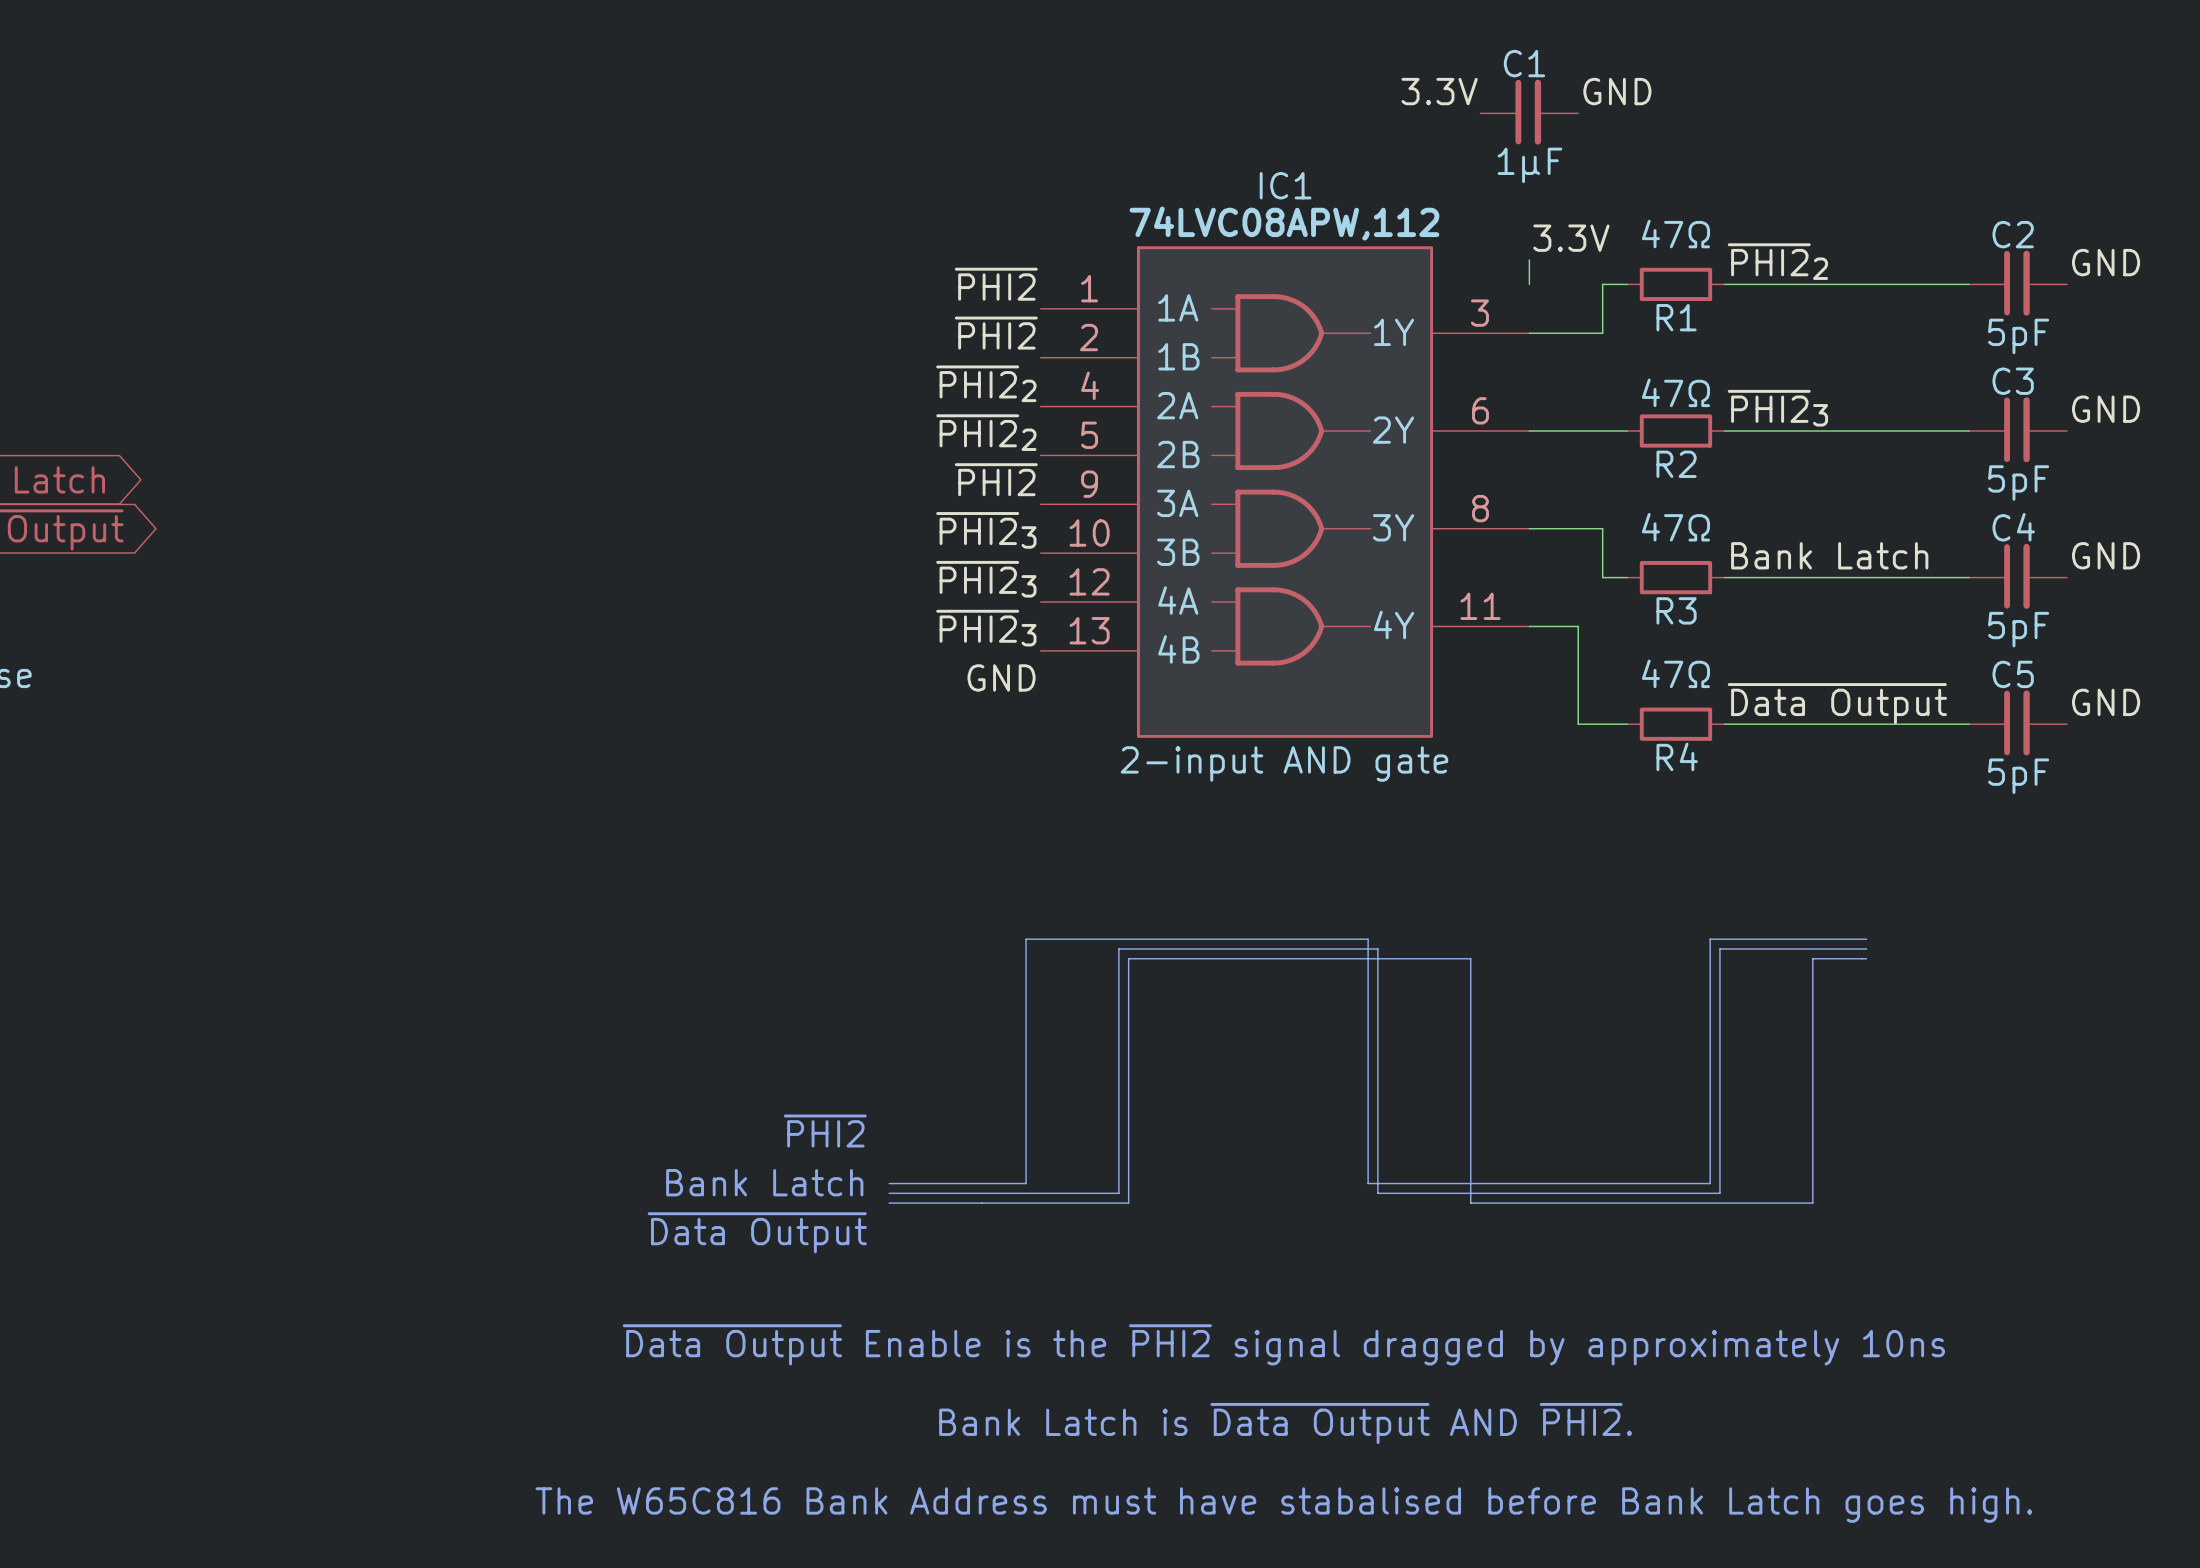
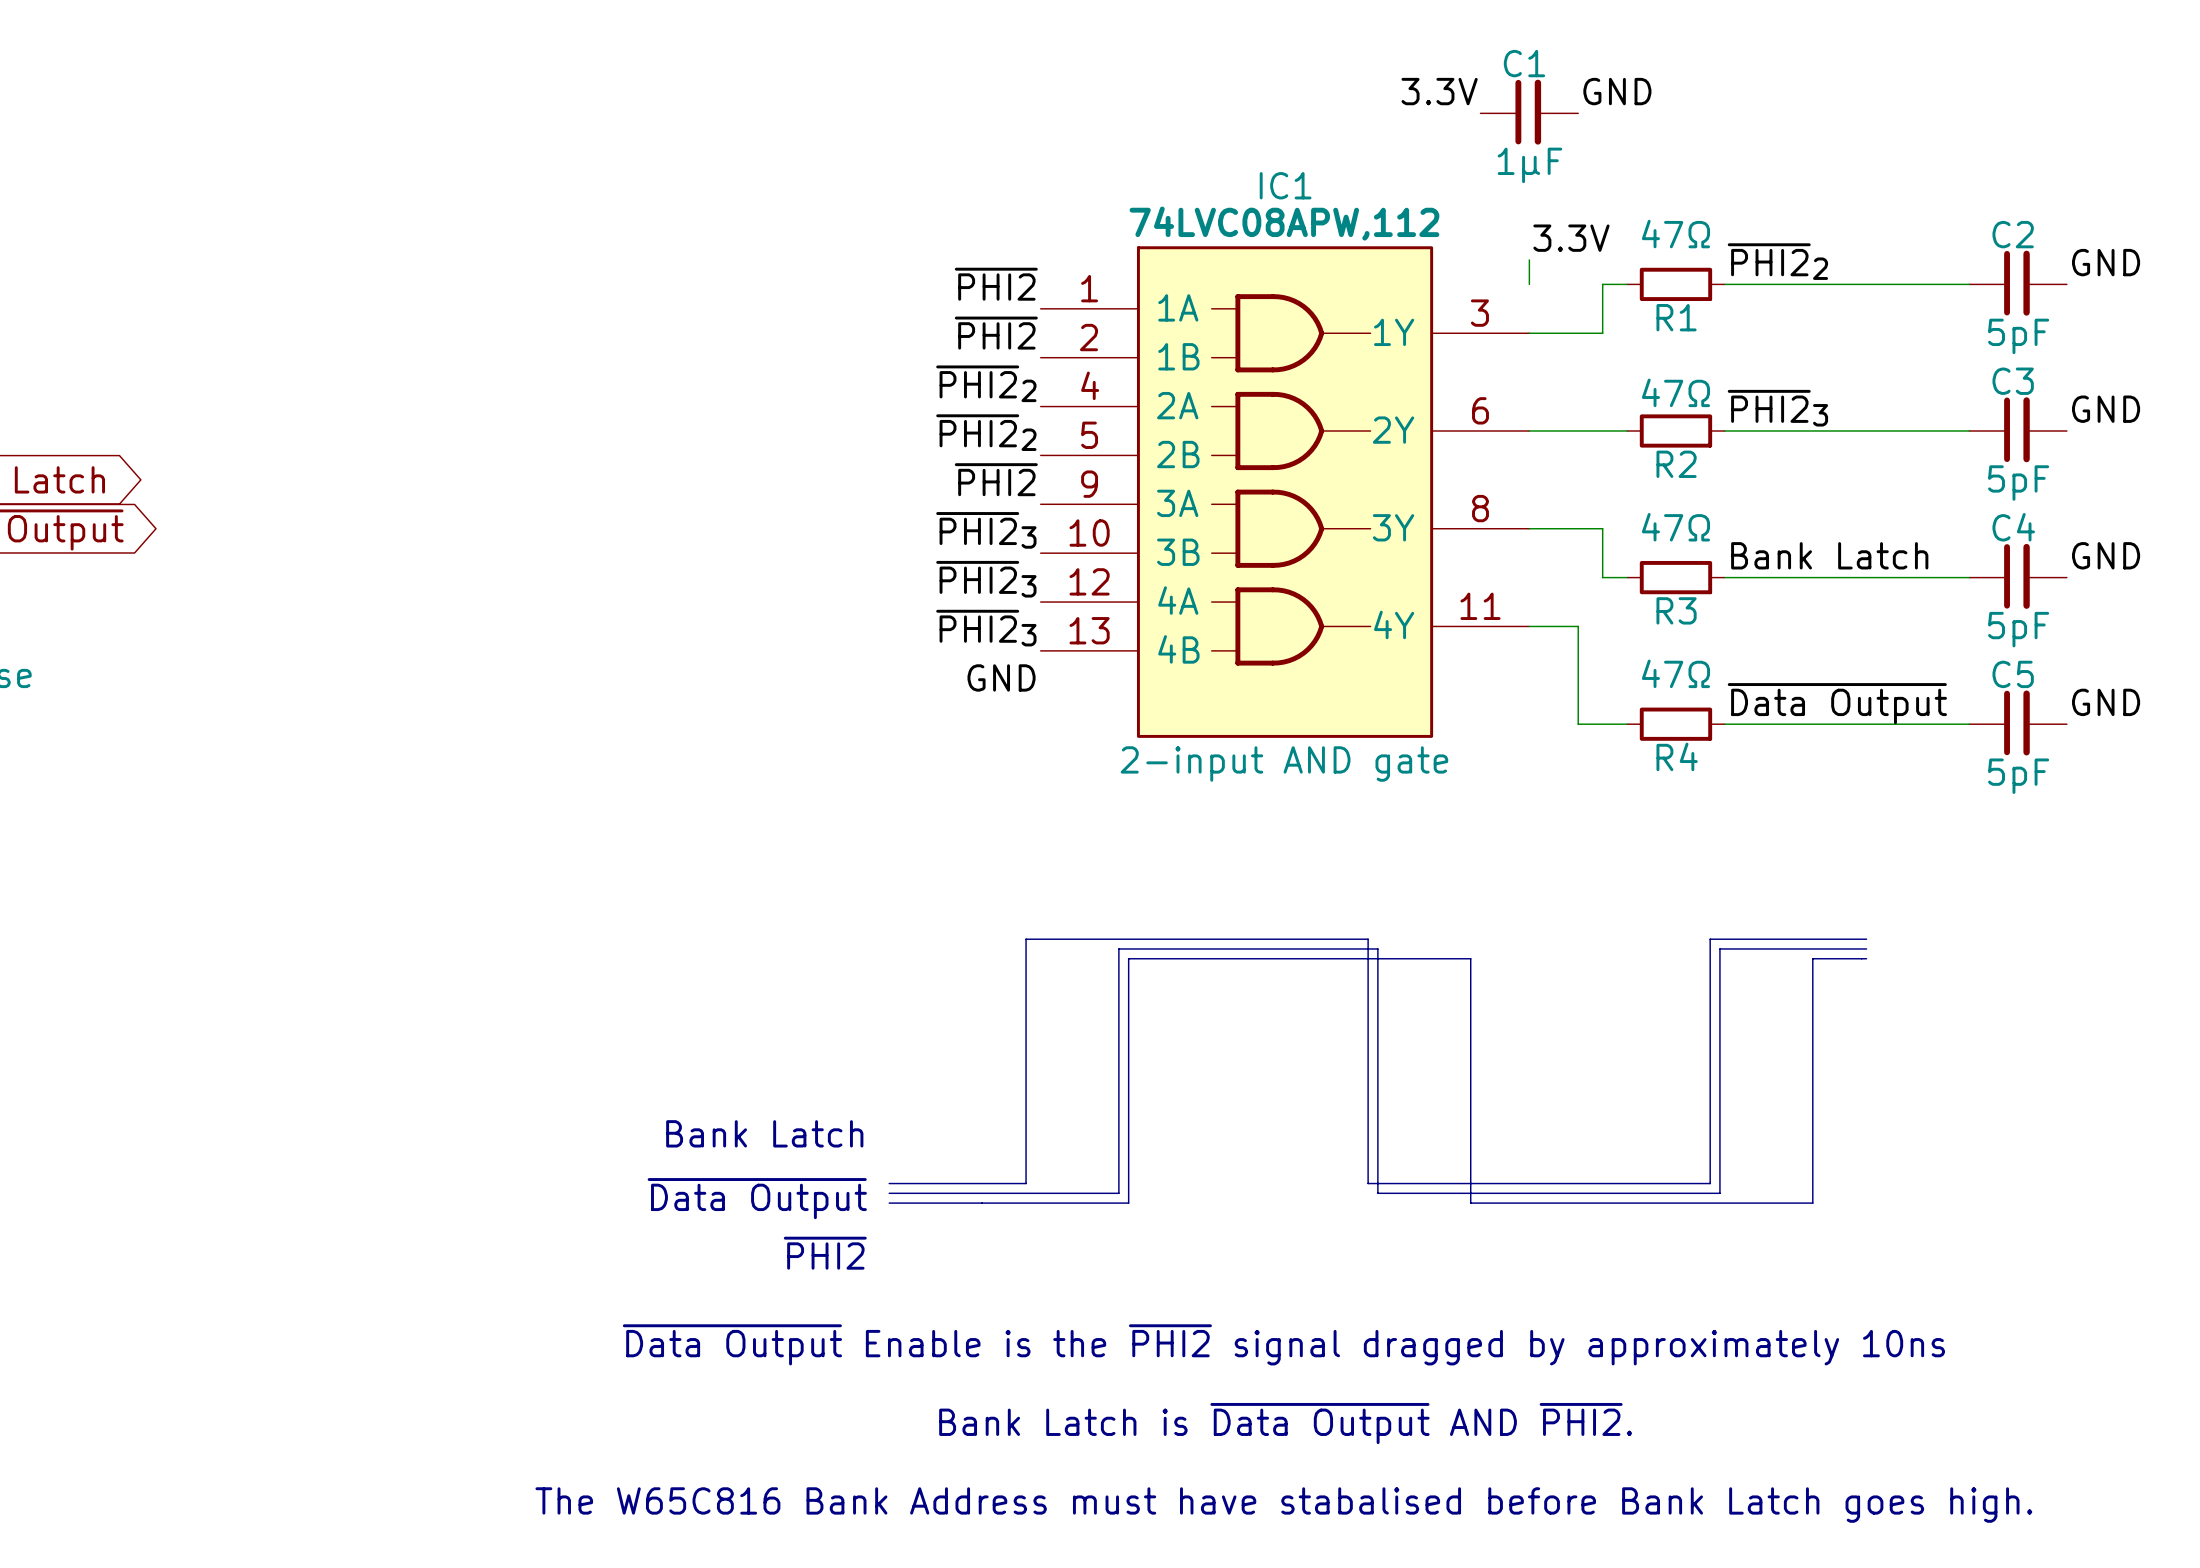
text: ~{PHI2} (825, 1131) -> Bank Latch (764, 1133)
text: Bank Latch (764, 1182) -> none
text position: ~{Data Output} (757, 1232) -> ~{Data Output} (757, 1198)
text: none -> ~{PHI2} (825, 1253)

